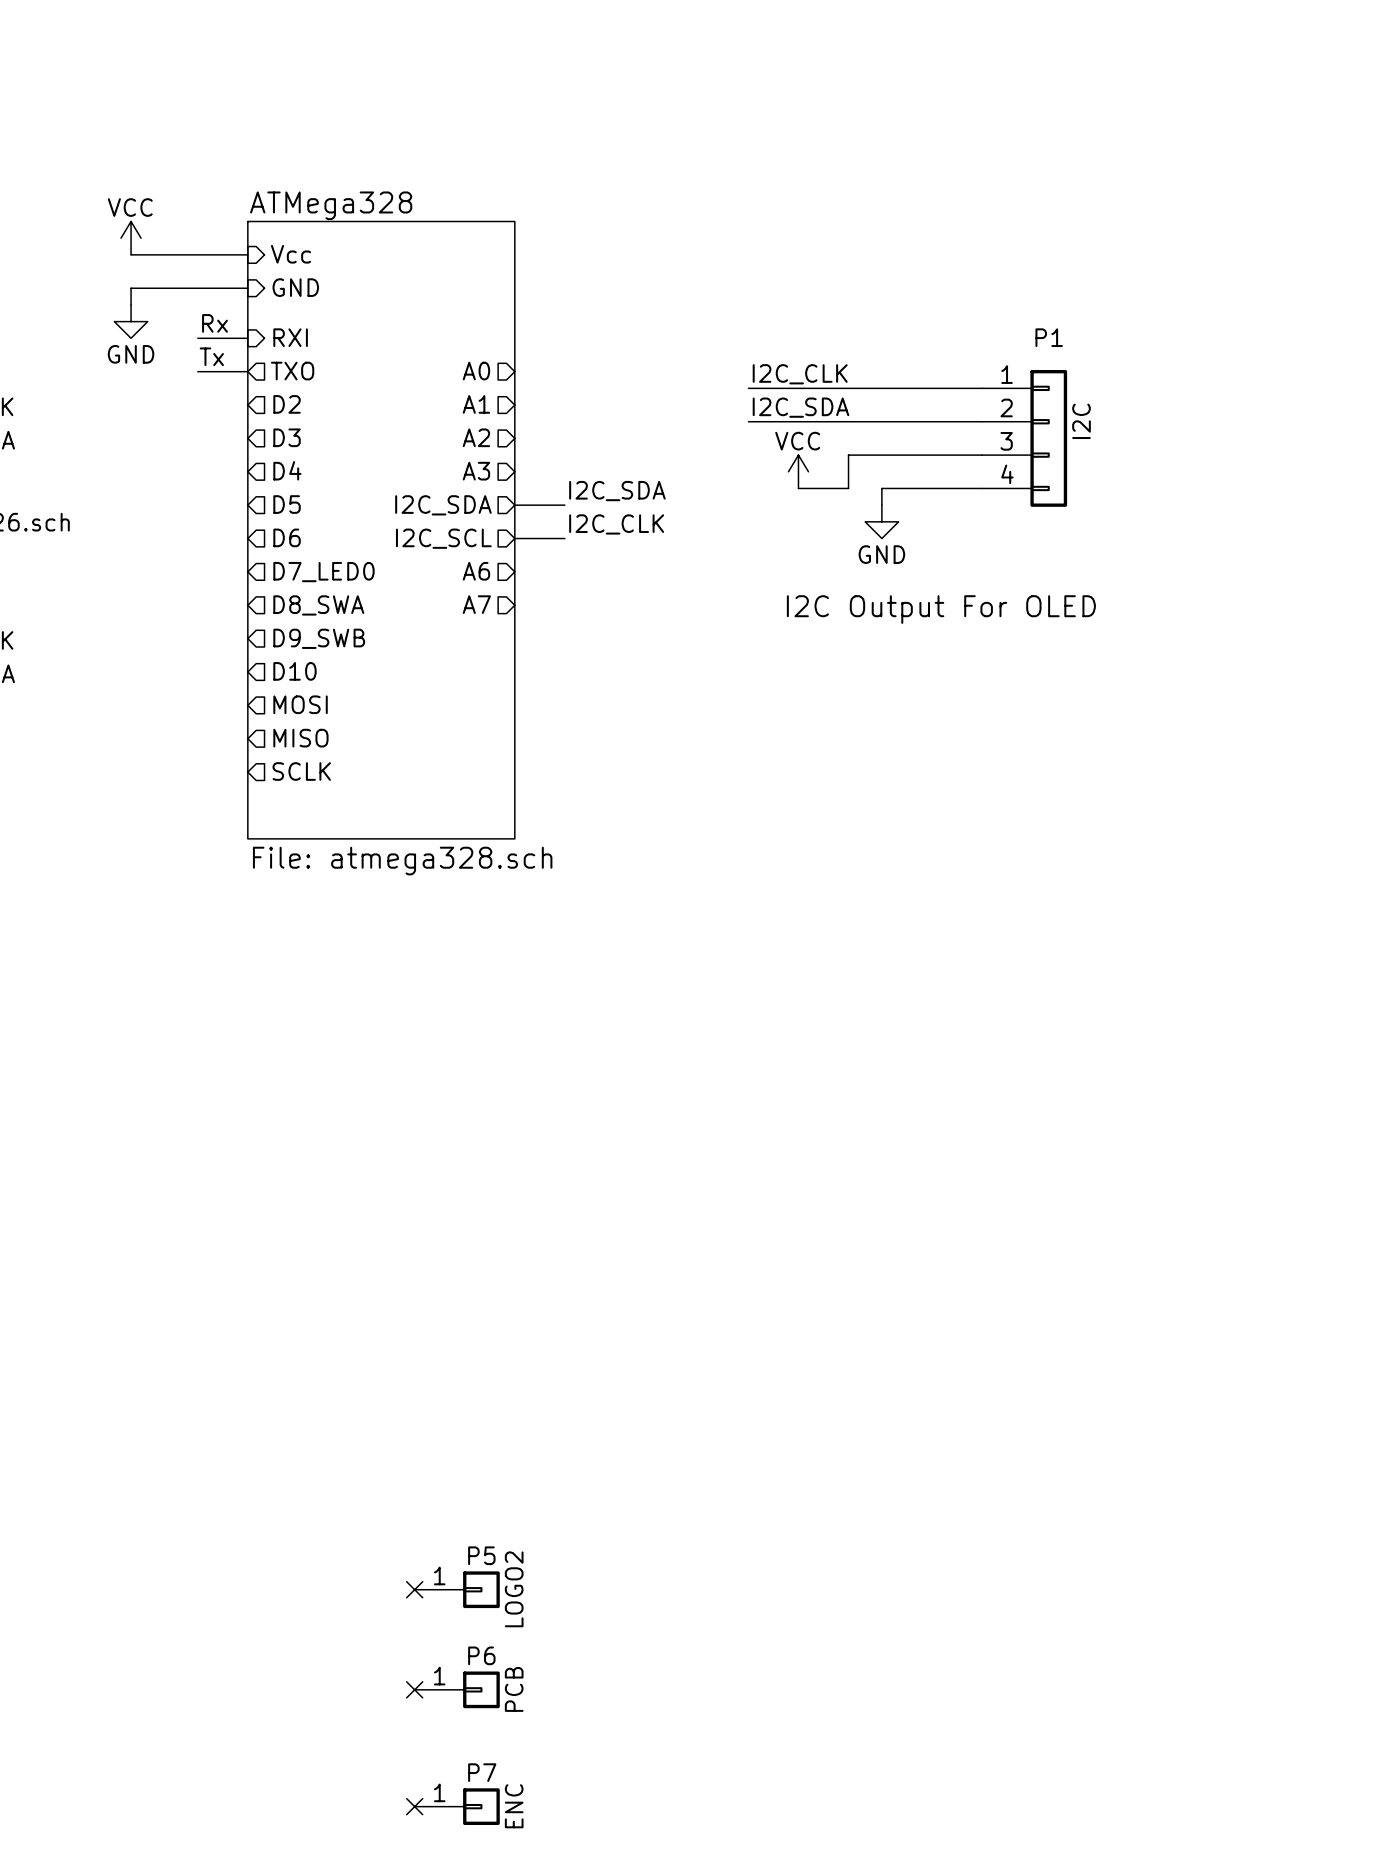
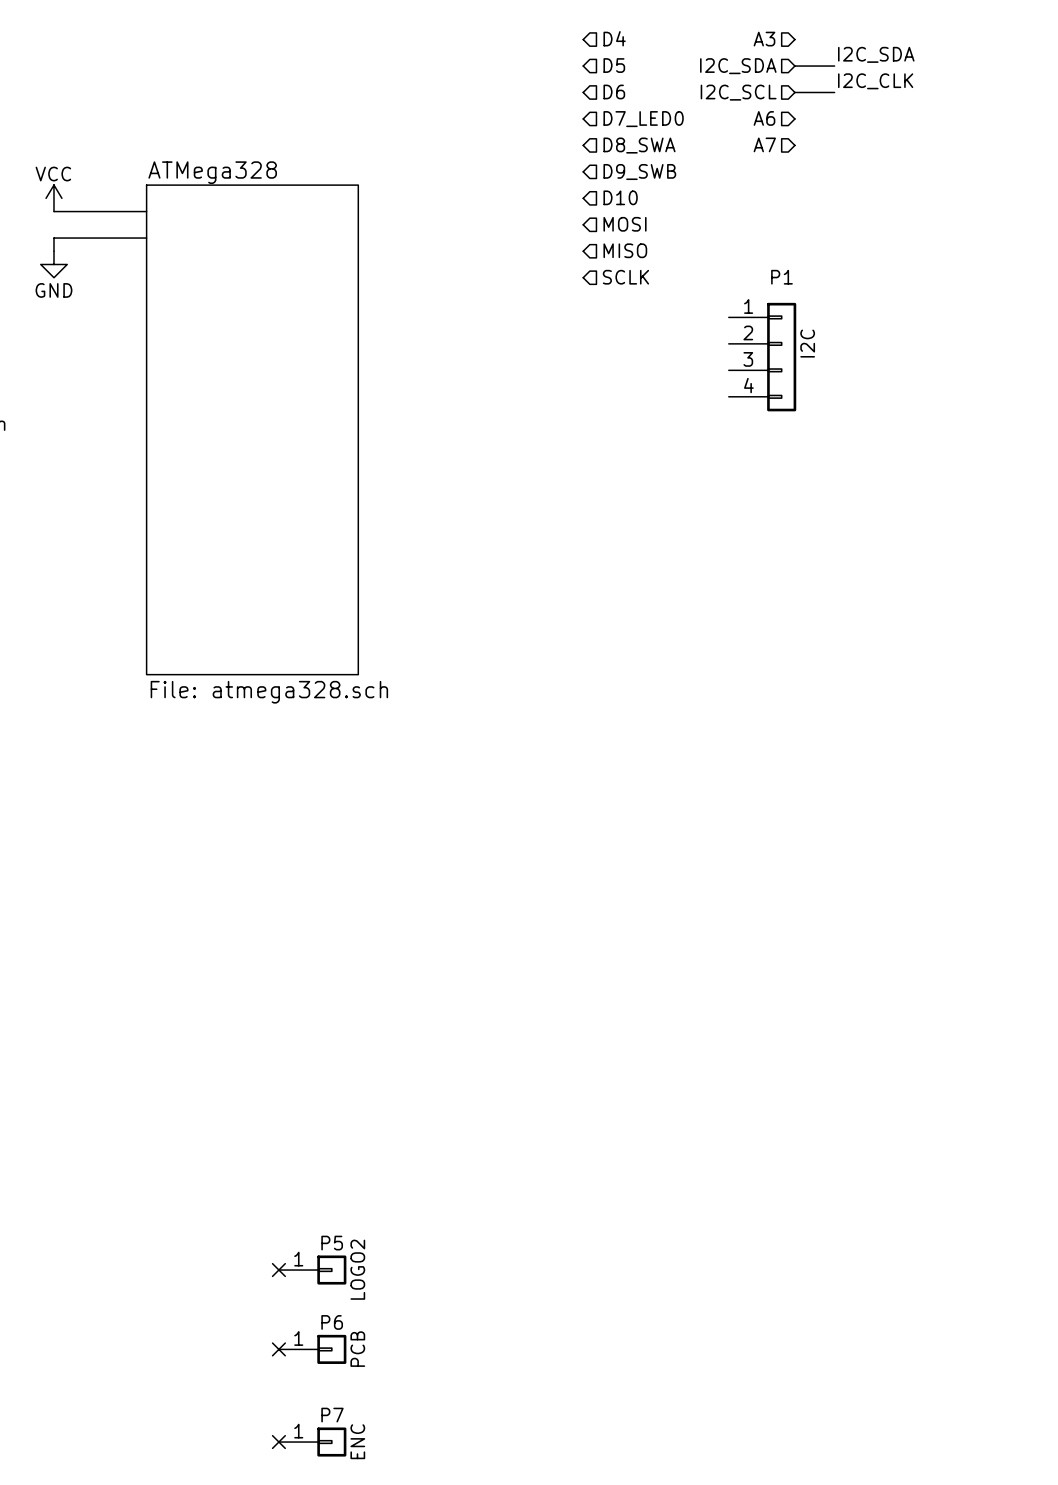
sheet pin: none -> D4 (614, 38)
sheet pin: none -> A3 (764, 39)
label: none -> I2C_SDA (876, 54)
sheet pin: none -> D5 (614, 65)
sheet pin: none -> I2C_SDA (738, 66)
wire: none -> (794, 66) (834, 66)
label: none -> I2C_CLK (875, 81)
sheet pin: none -> D6 (614, 91)
sheet pin: none -> I2C_SCL (738, 92)
wire: none -> (794, 92) (834, 92)
sheet pin: none -> A6 (764, 118)
sheet pin: none -> D7_LED0 (643, 119)
sheet pin: none -> A7 (764, 144)
sheet pin: none -> D8_SWA (639, 145)
sheet pin: none -> D9_SWB (639, 172)
sheet pin: none -> D10 (620, 197)
sheet pin: Vcc (291, 254) -> none
sheet pin: none -> MOSI (625, 224)
sheet pin: GND (295, 287) -> none
sheet pin: none -> MISO (625, 250)
label: Rx (214, 323) -> none
sheet pin: RXI (290, 337) -> none
sheet pin: none -> SCLK (625, 277)
wire: (197, 338) (247, 338) -> none
label: Tx (211, 356) -> none
wire: (197, 371) (247, 371) -> none
sheet pin: TXO (292, 371) -> none
sheet pin: A0 (476, 371) -> none
label: I2C_CLK (800, 374) -> none
wire: (748, 388) (982, 388) -> none
sheet pin: D2 (287, 404) -> none
sheet pin: A1 (476, 404) -> none
label: I2C_SDA (800, 407) -> none
wire: (748, 421) (982, 421) -> none
sheet pin: D3 (287, 437) -> none
sheet pin: A2 (476, 437) -> none
wire: (982, 455) (848, 455) (848, 488) (798, 488) -> none
sheet pin: D4 (287, 470) -> none
sheet pin: A3 (476, 471) -> none
power symbol: VCC (798, 471) -> none
wire: (982, 488) (881, 488) (881, 505) -> none
label: I2C_SDA (617, 491) -> none
sheet pin: D5 (287, 504) -> none
sheet pin: I2C_SDA (443, 505) -> none
wire: (514, 505) (564, 505) -> none
power symbol: GND (881, 521) -> none
label: I2C_CLK (616, 524) -> none
sheet pin: D6 (287, 537) -> none
sheet pin: I2C_SCL (443, 538) -> none
wire: (514, 538) (564, 538) -> none
sheet pin: A6 (476, 571) -> none
sheet pin: D7_LED0 (323, 572) -> none
sheet pin: A7 (476, 604) -> none
sheet pin: D8_SWA (318, 605) -> none
text: I2C Output For OLED (941, 609) -> none
sheet pin: D9_SWB (319, 638) -> none
sheet pin: D10 (294, 671) -> none
sheet pin: MOSI (300, 704) -> none
sheet pin: MISO (300, 738) -> none
sheet pin: SCLK (301, 771) -> none

